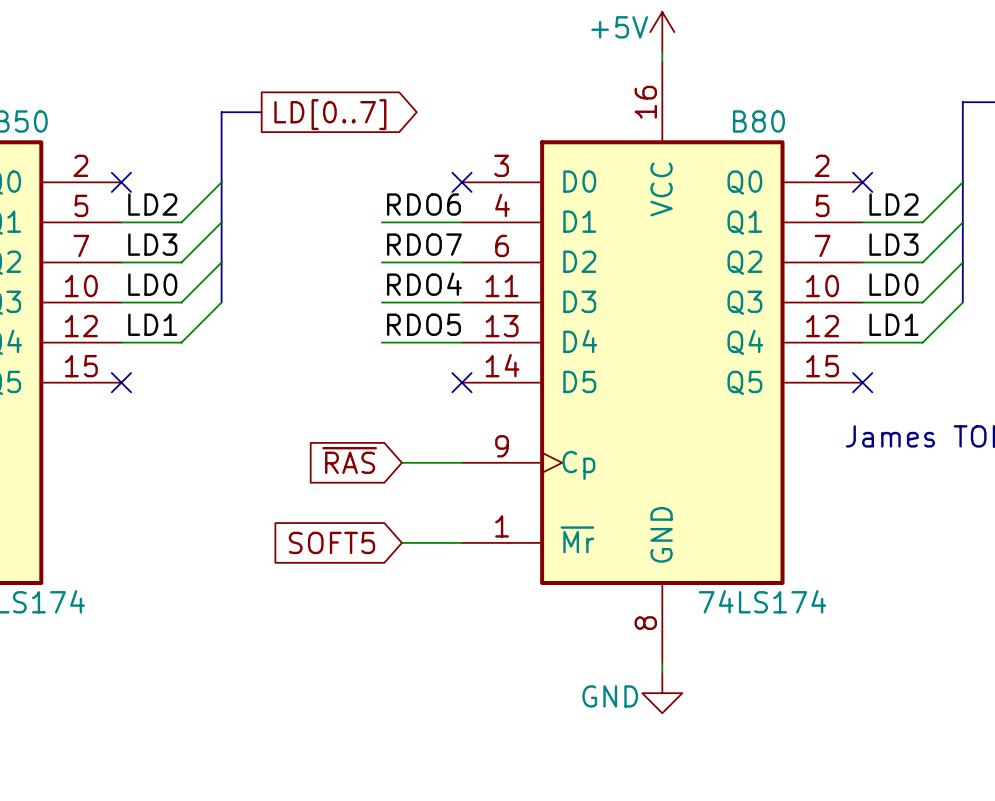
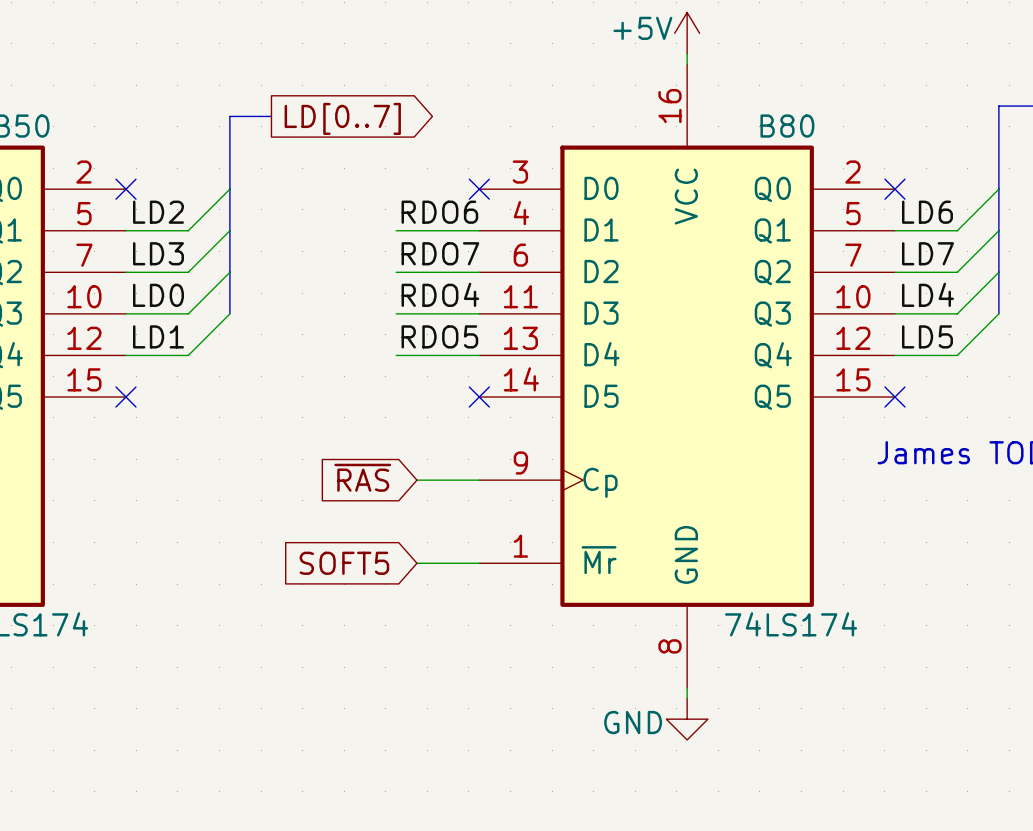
label: LD2 (893, 204) -> LD6 (927, 212)
label: LD3 (893, 244) -> LD7 (927, 253)
label: LD0 (893, 284) -> LD4 (927, 294)
label: LD1 (893, 324) -> LD5 (927, 336)

